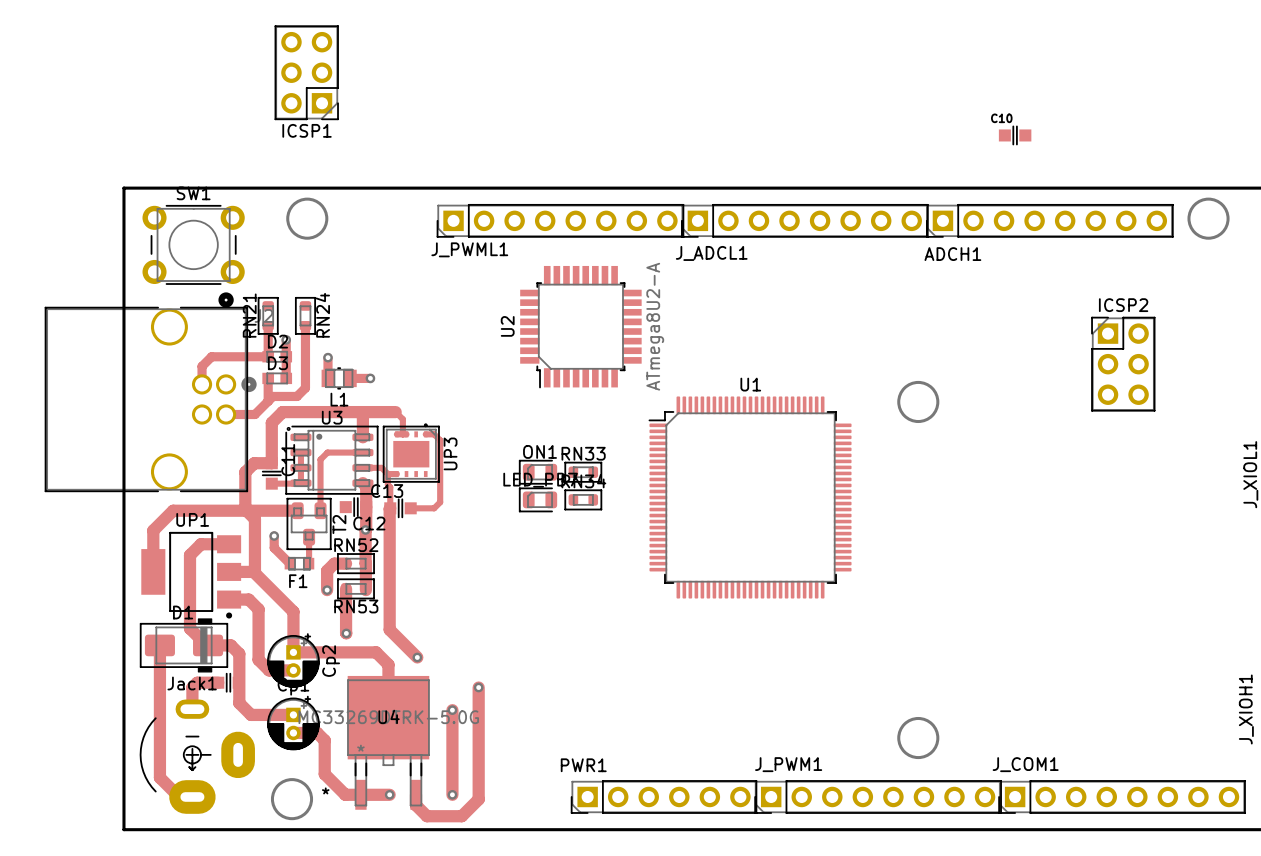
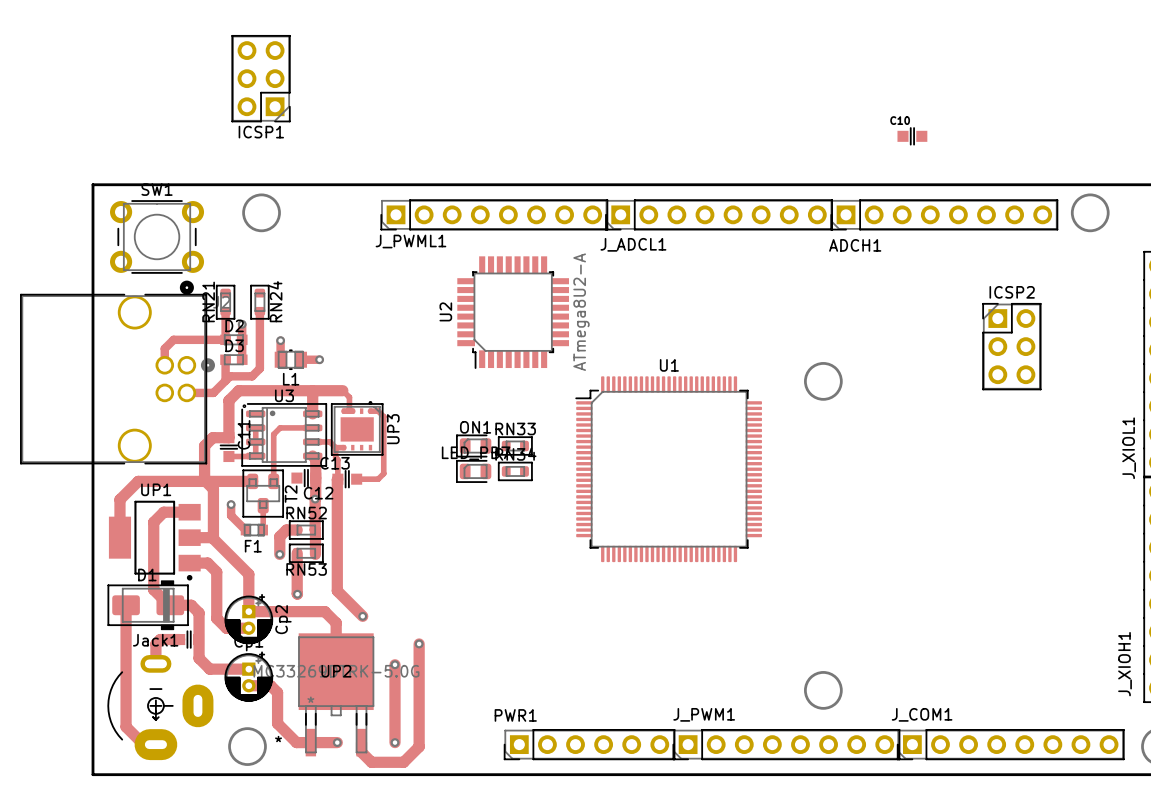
U4 name: U4 (389, 716) -> UP2 (336, 671)

